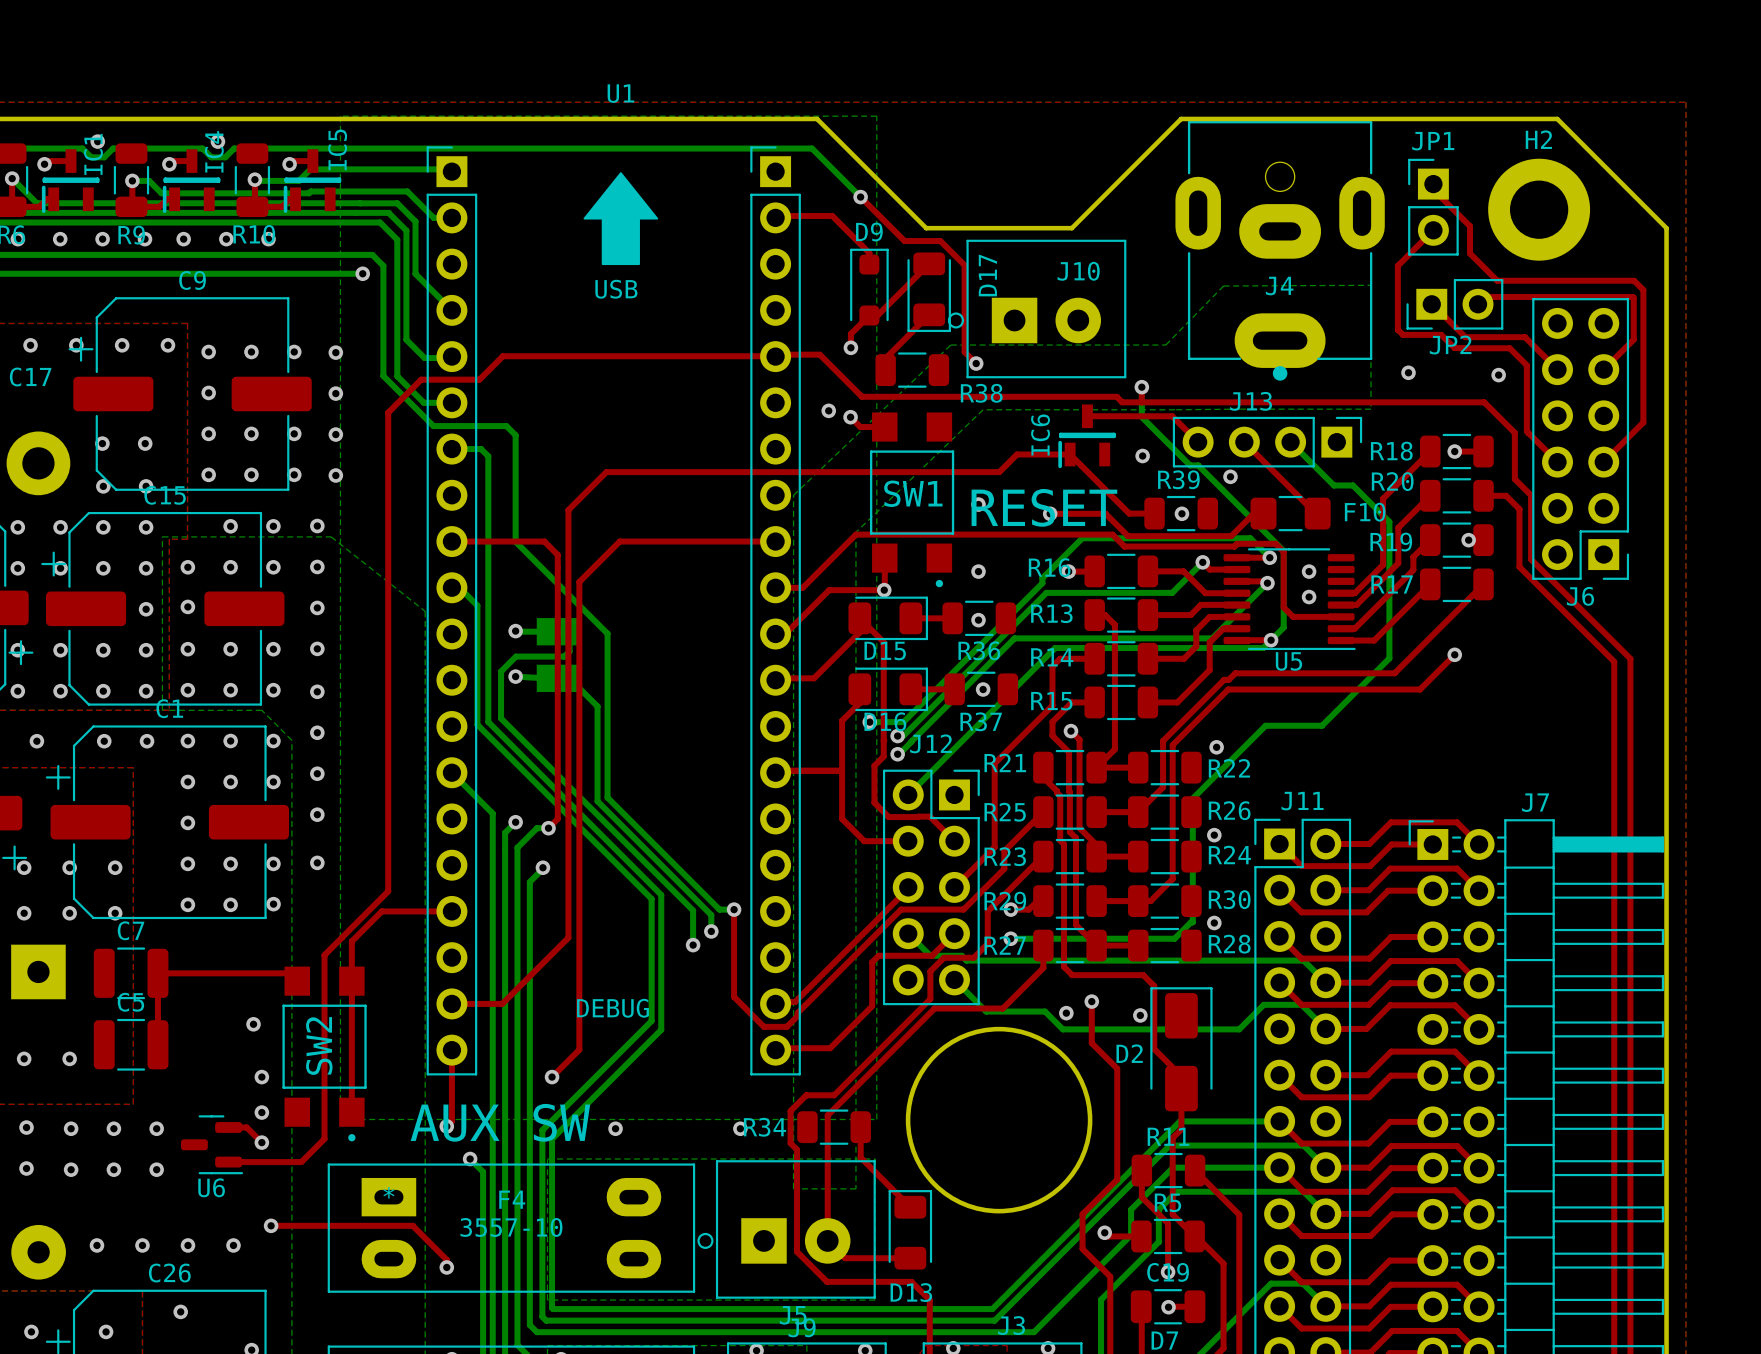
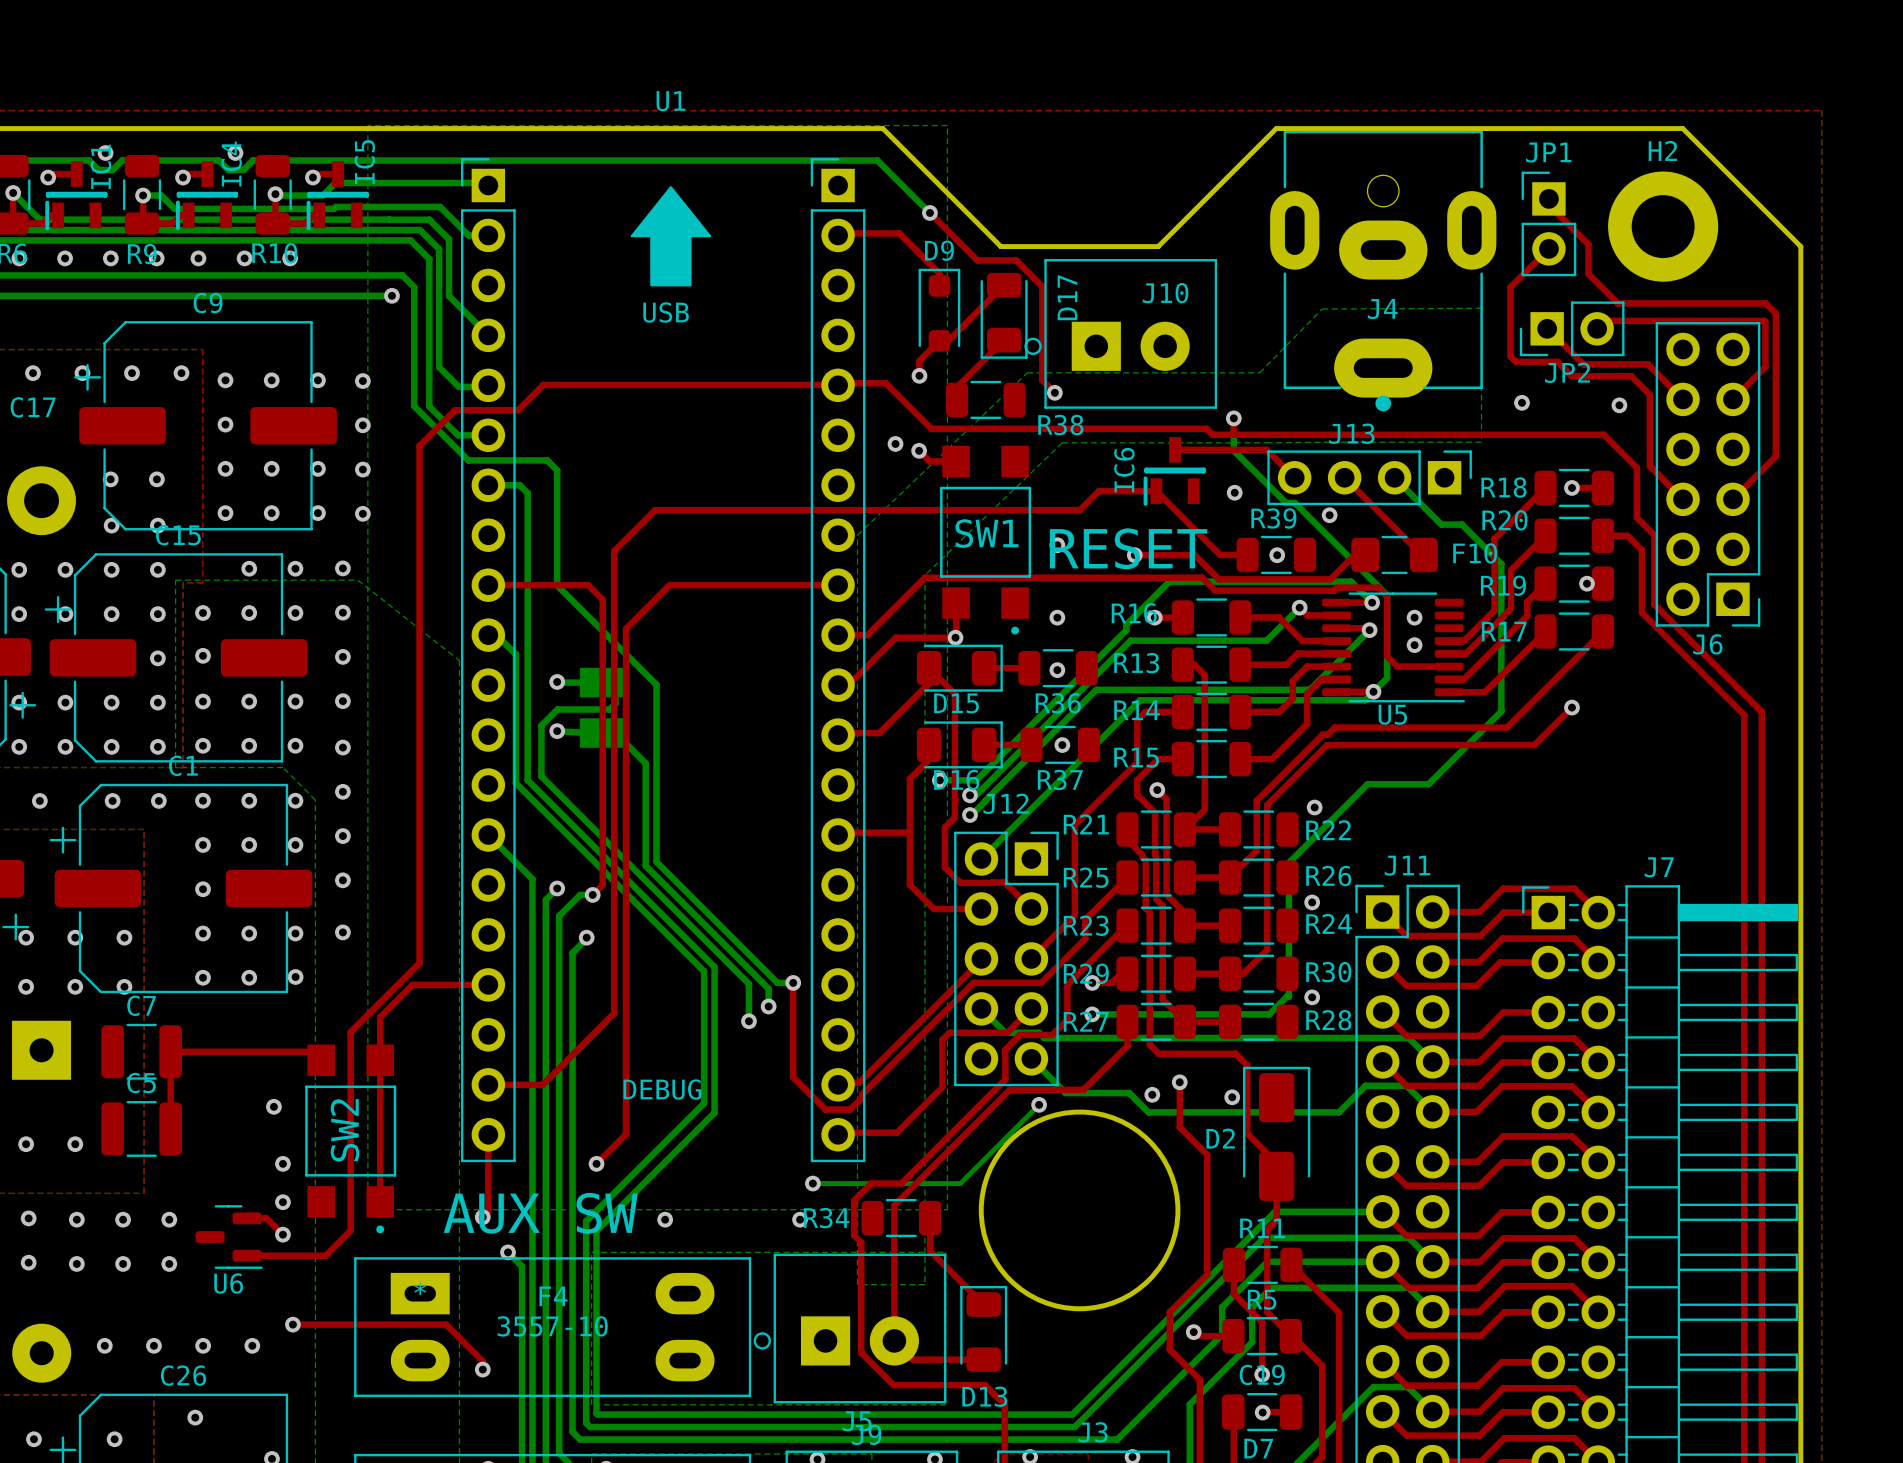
bottom track: none -> (1039, 1104) (960, 1183) (812, 1183)
via: none -> (1039, 1104)
via: none -> (812, 1183)

